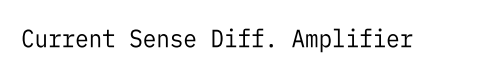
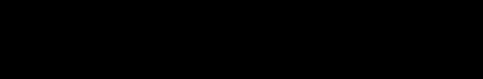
text: Current Sense Diff. Amplifier (217, 40) -> none

